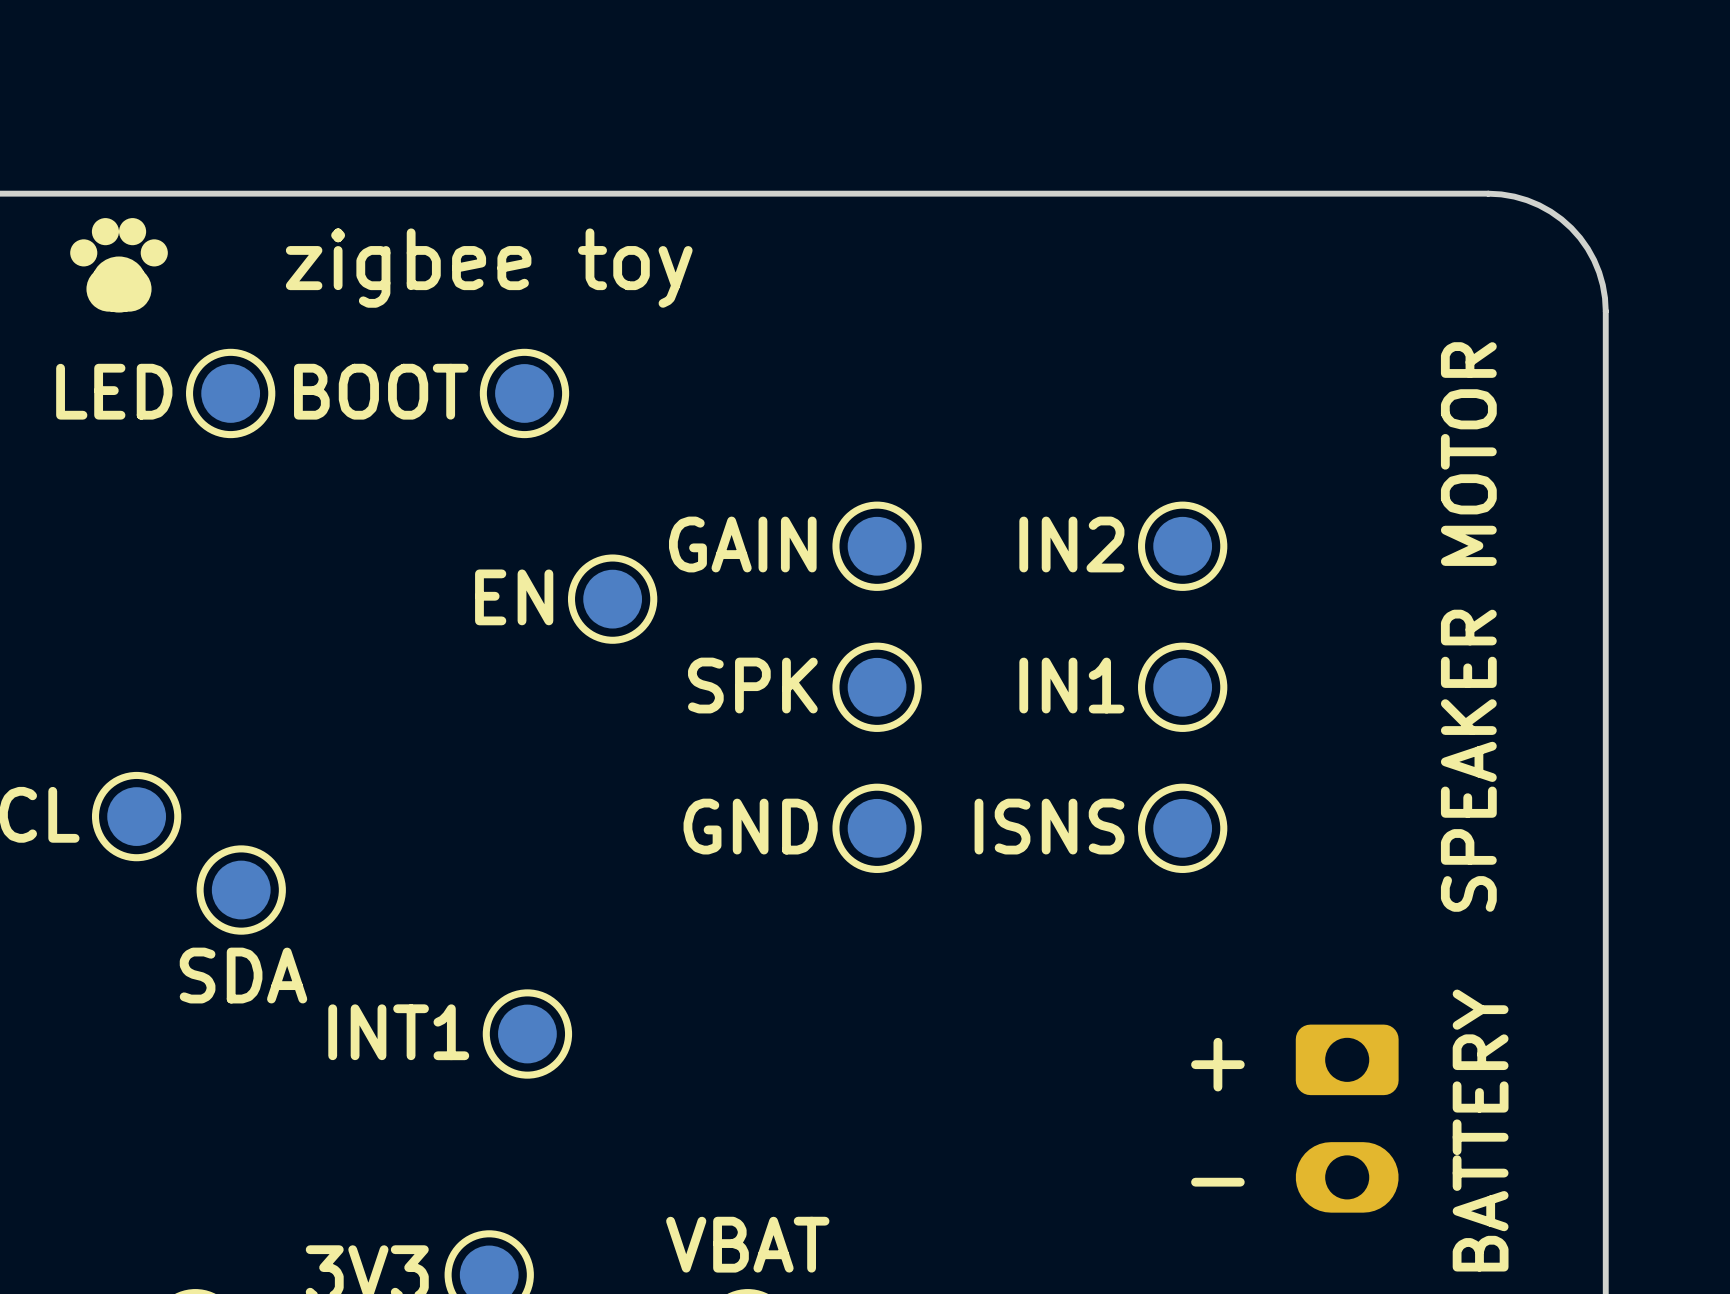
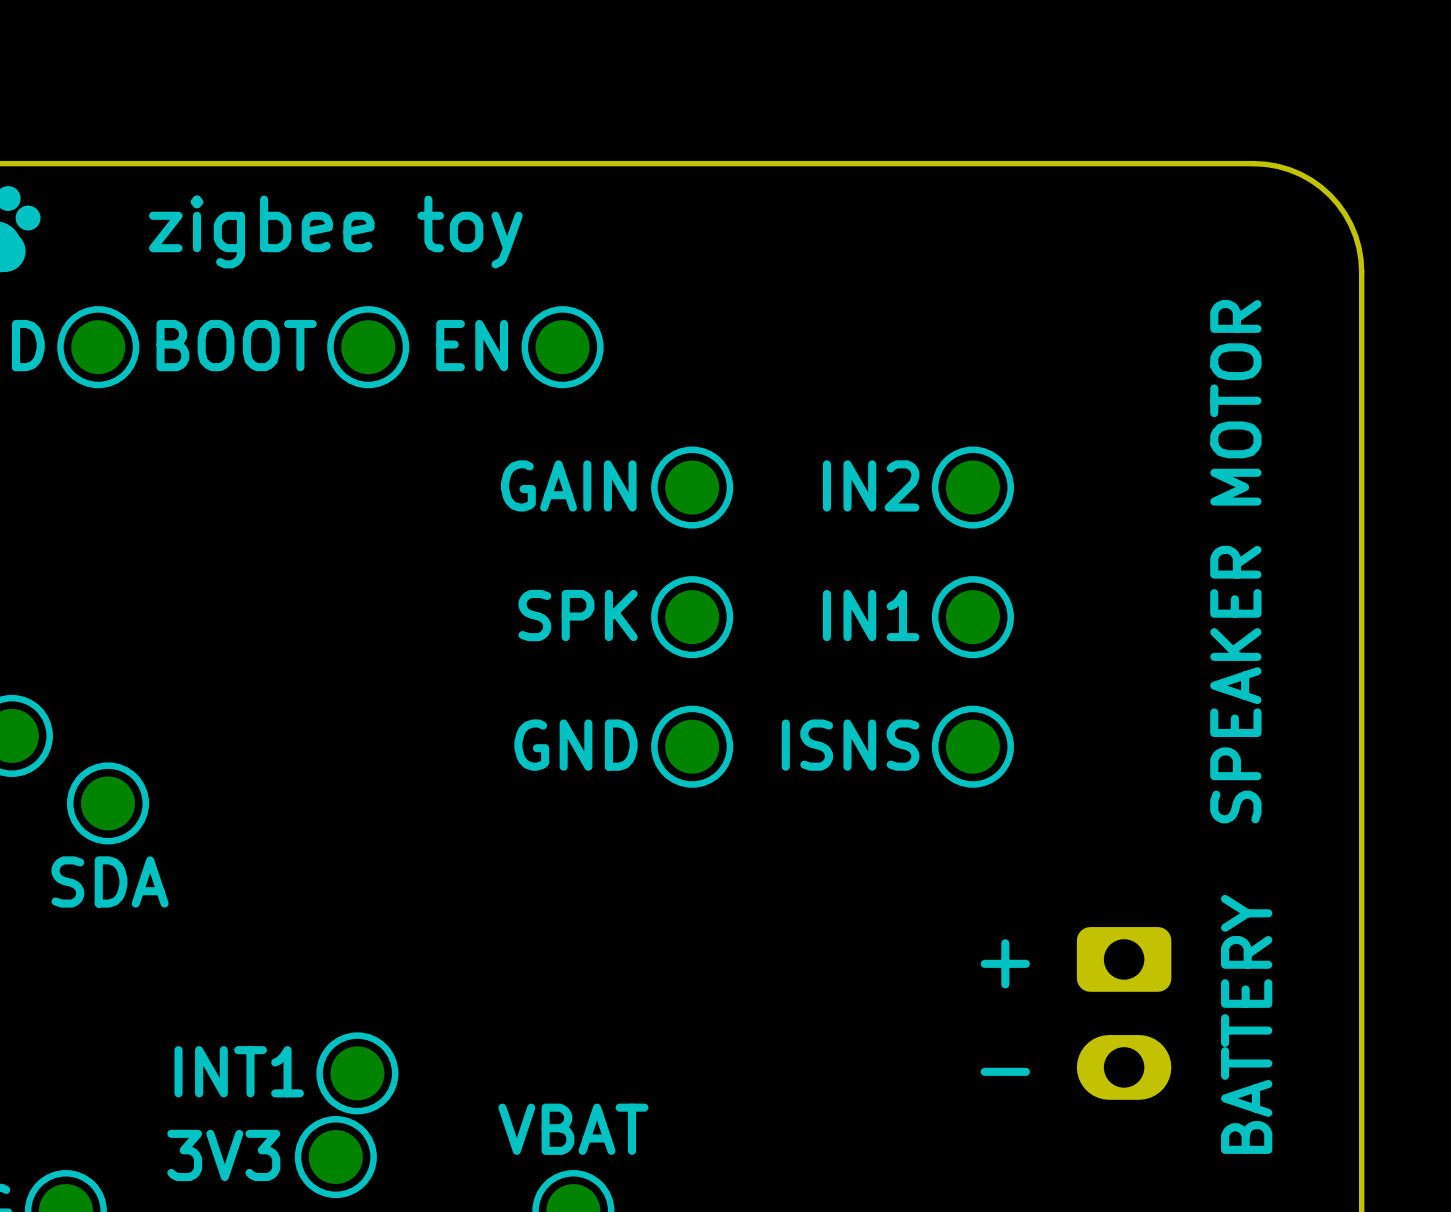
text position: EN (514, 597) -> EN (472, 345)
part position: (612, 599) -> (562, 347)
text position: INT1 (398, 1032) -> INT1 (239, 1071)
part position: (527, 1034) -> (357, 1073)

